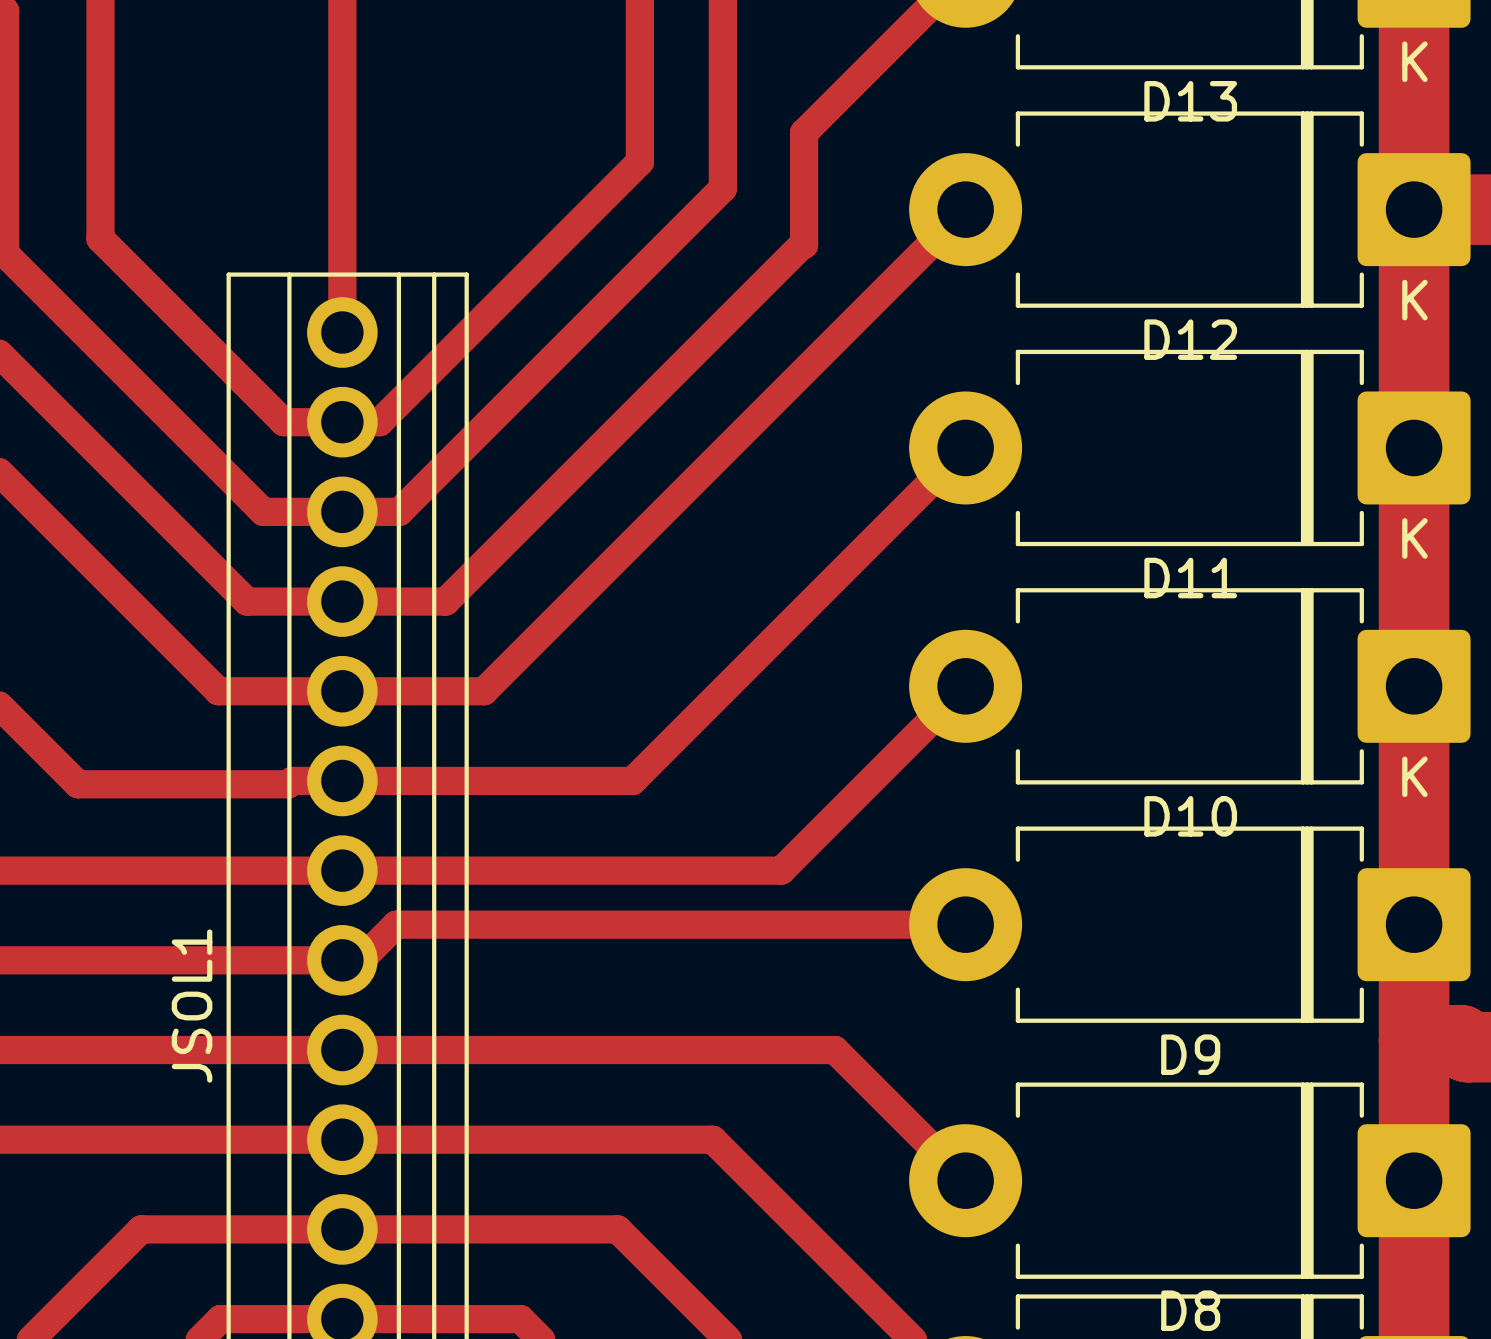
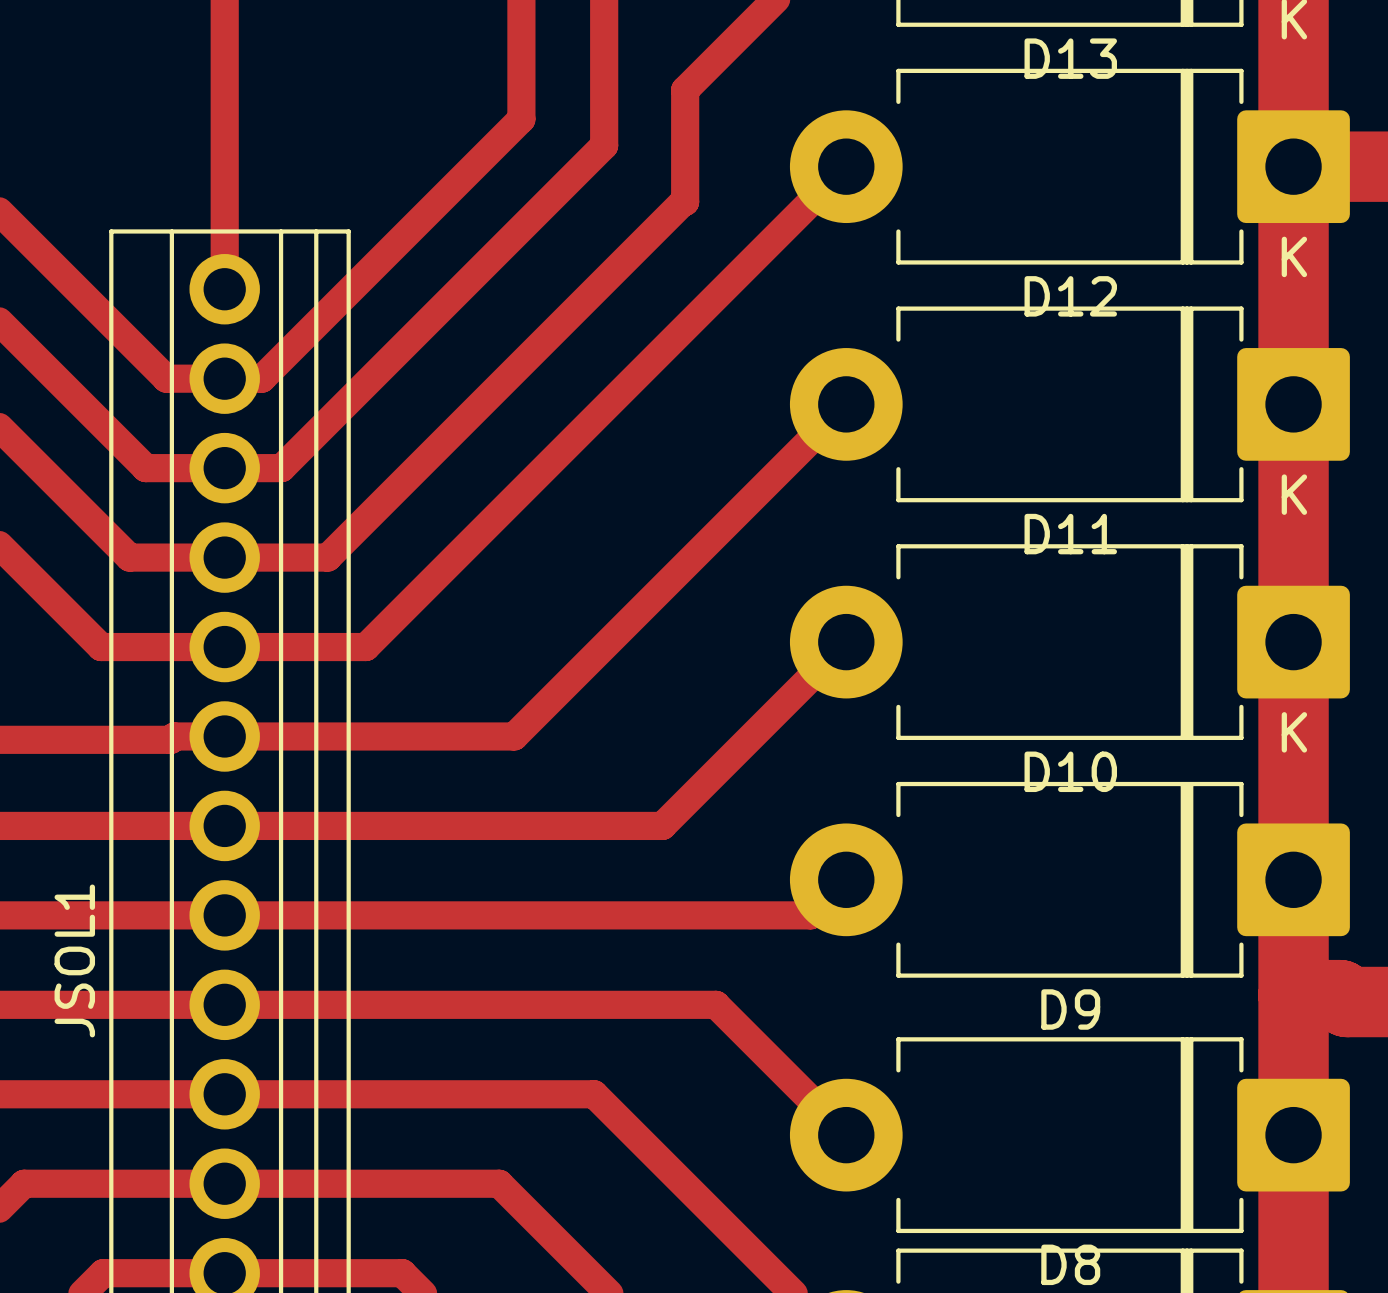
track: (965, 924) (396, 924) (360, 960) -> (846, 879) (810, 915) (242, 915)

